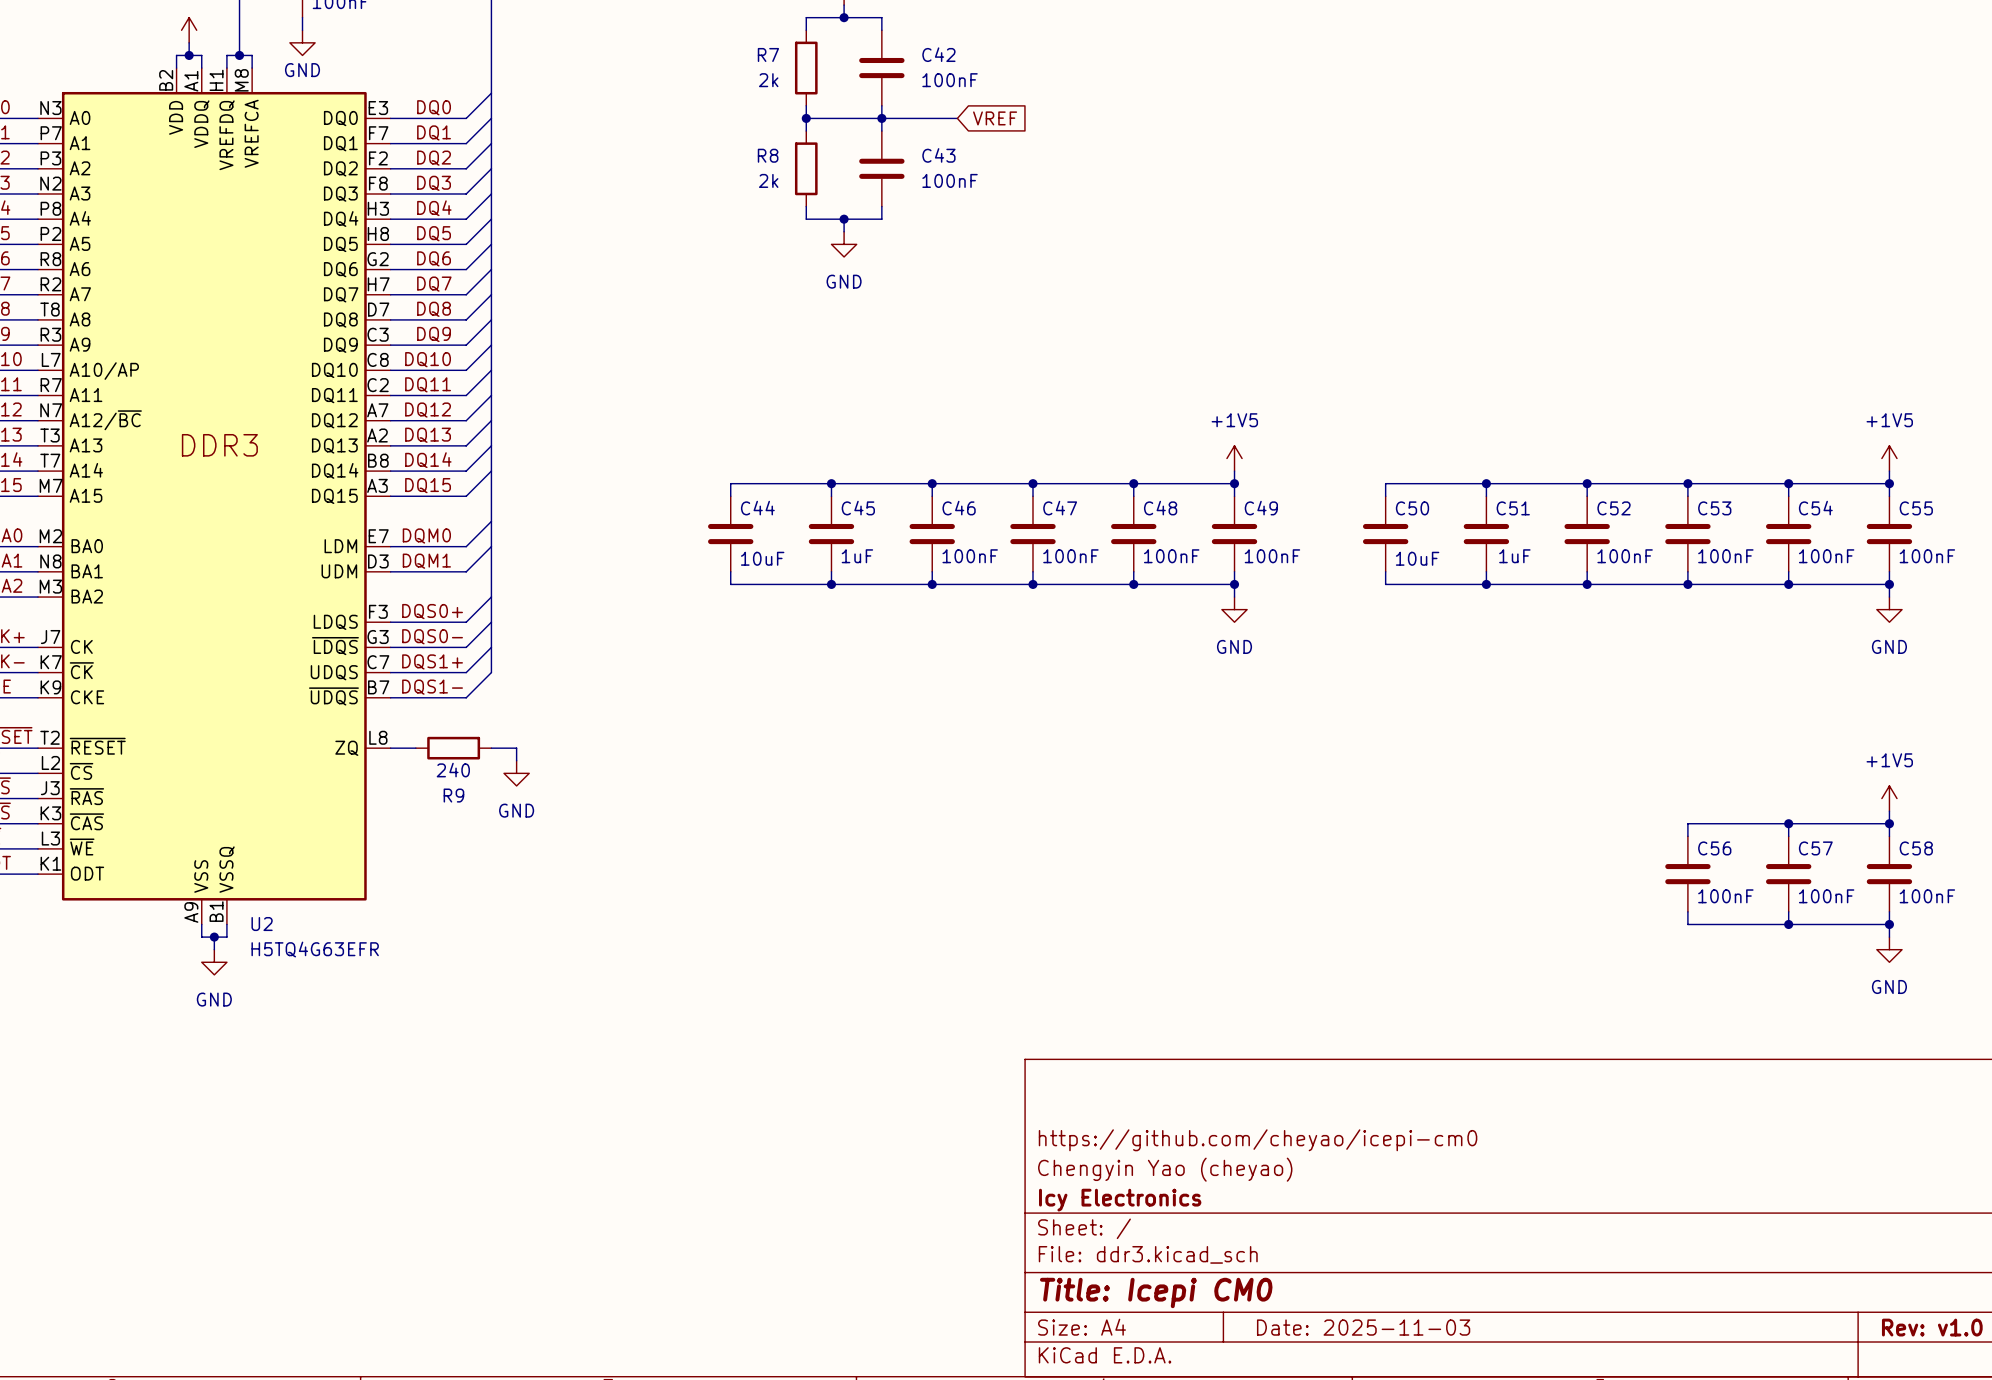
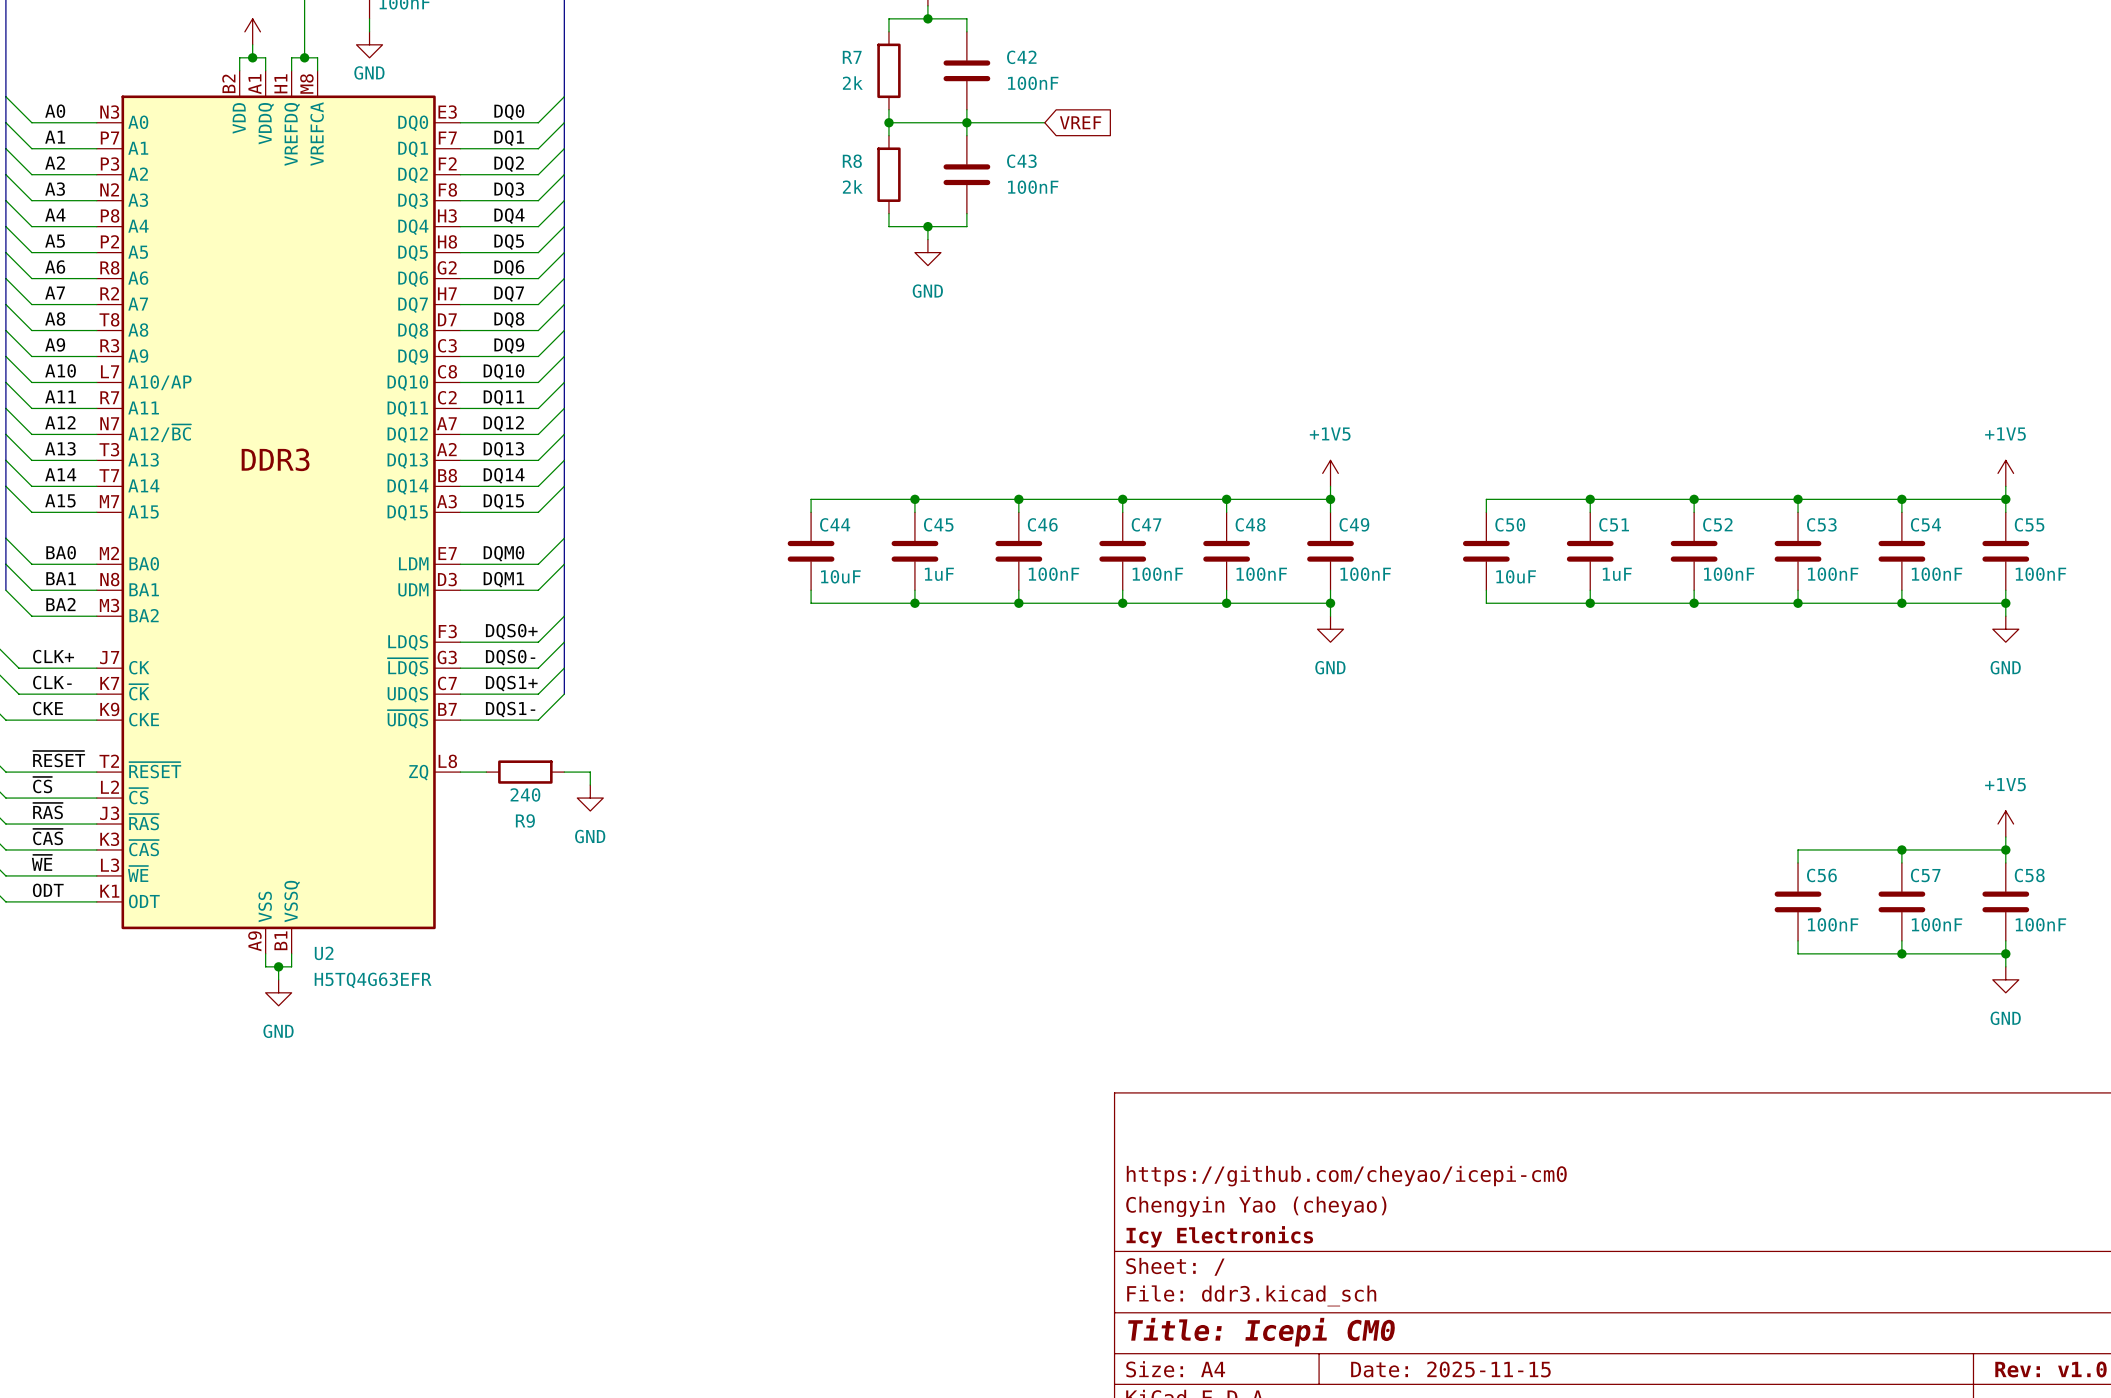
title block: Date: 2025-11-03 (1363, 1327) -> Date: 2025-11-15 (1450, 1369)

